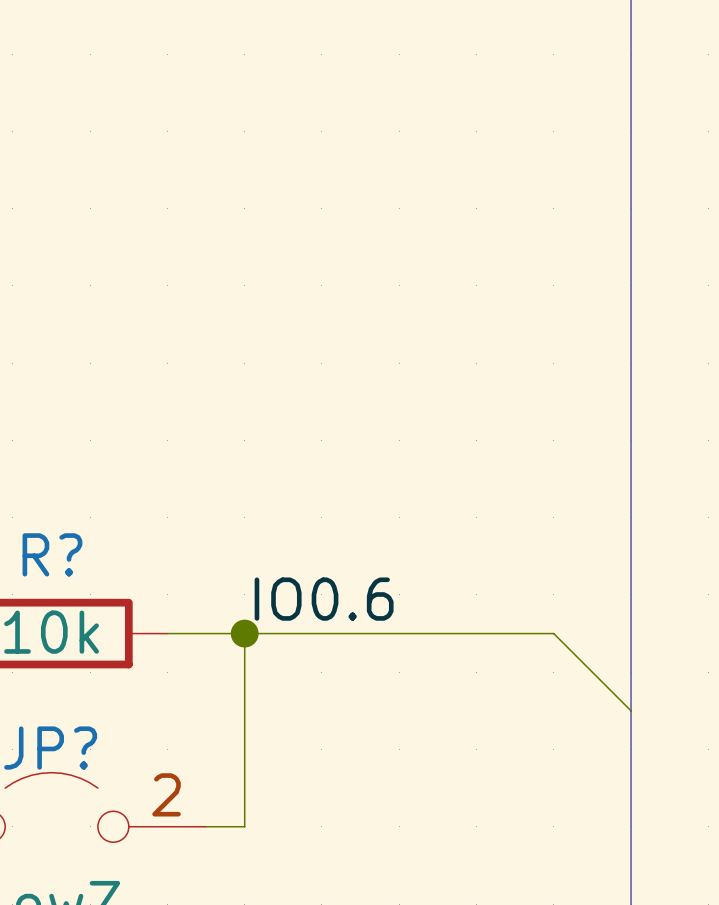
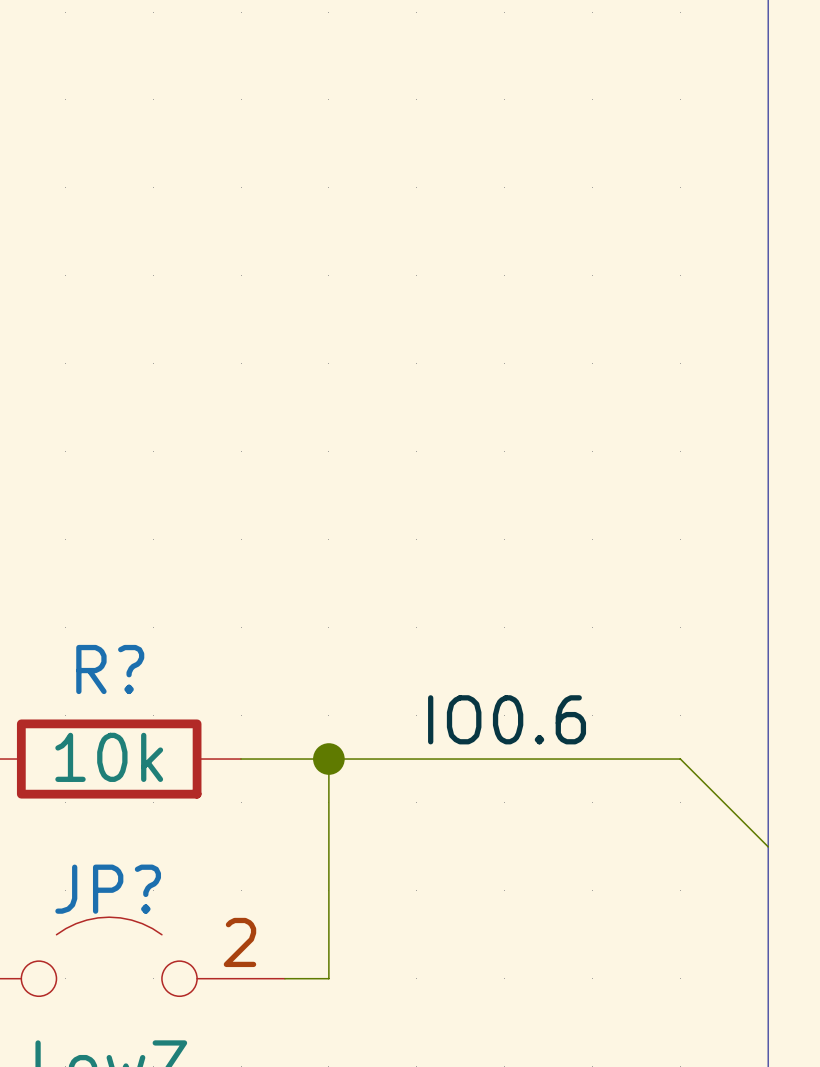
label position: IO0.6 (324, 599) -> IO0.6 (507, 719)

